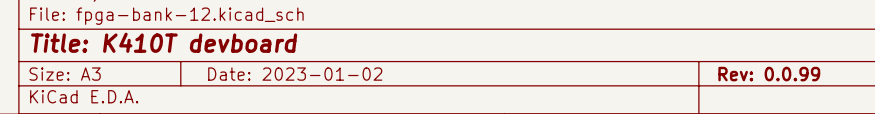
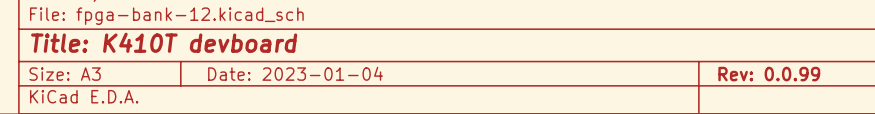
title block: Date: 2023-01-02 (295, 74) -> Date: 2023-01-04 (295, 73)

